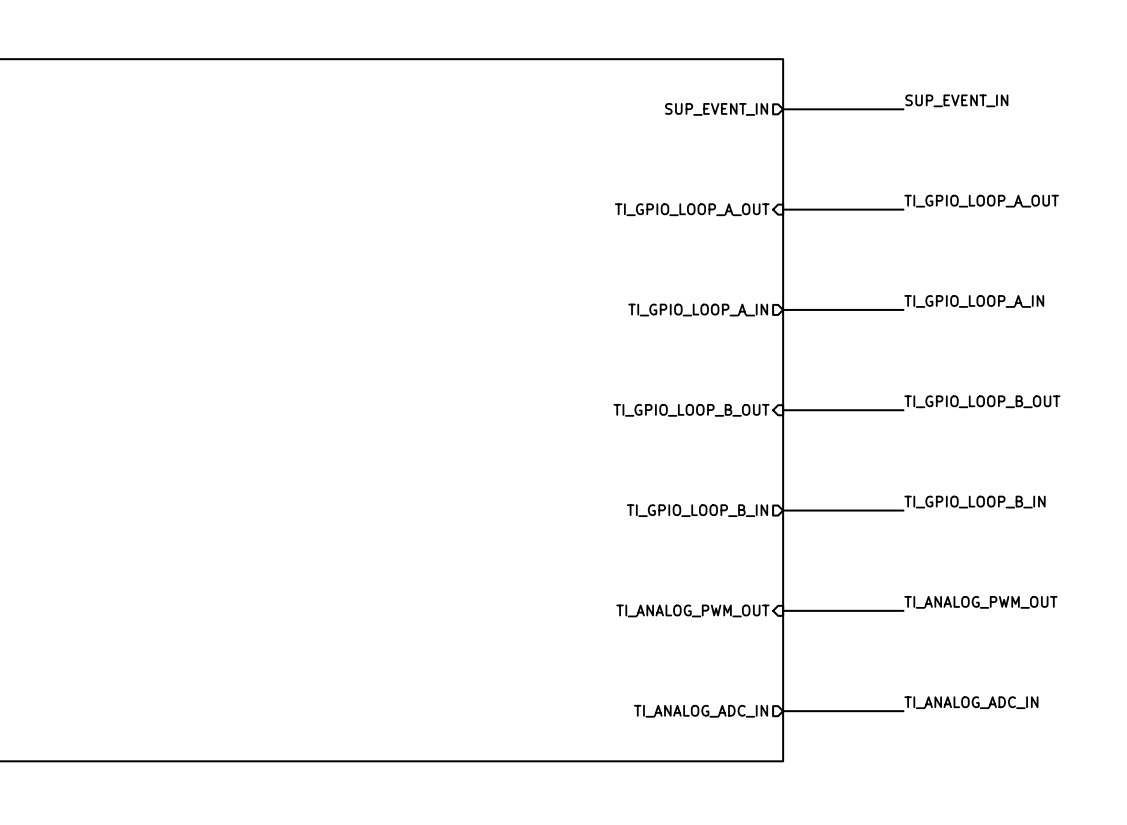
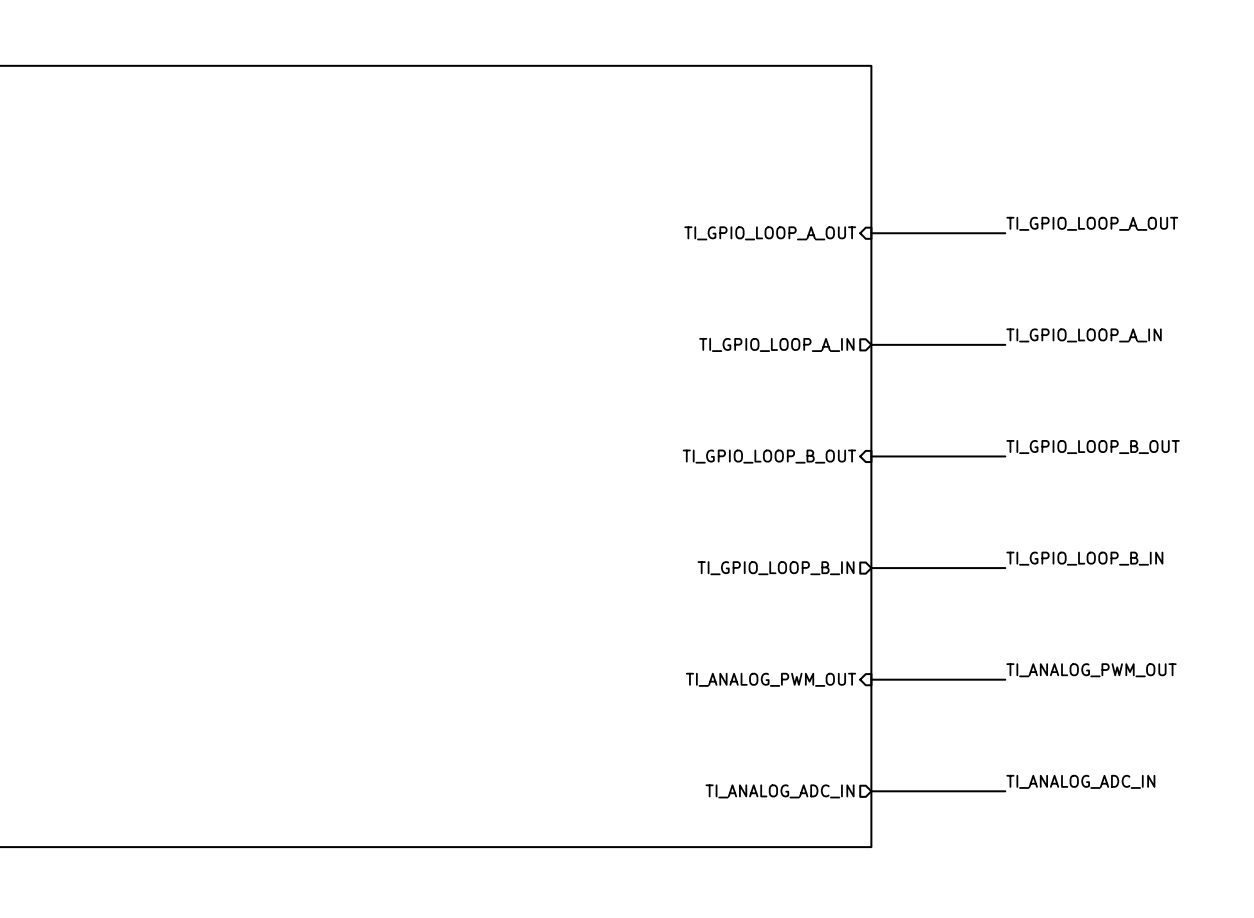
label: SUP_EVENT_IN (956, 100) -> none
sheet pin: SUP_EVENT_IN (716, 109) -> none
wire: (783, 109) (903, 109) -> none

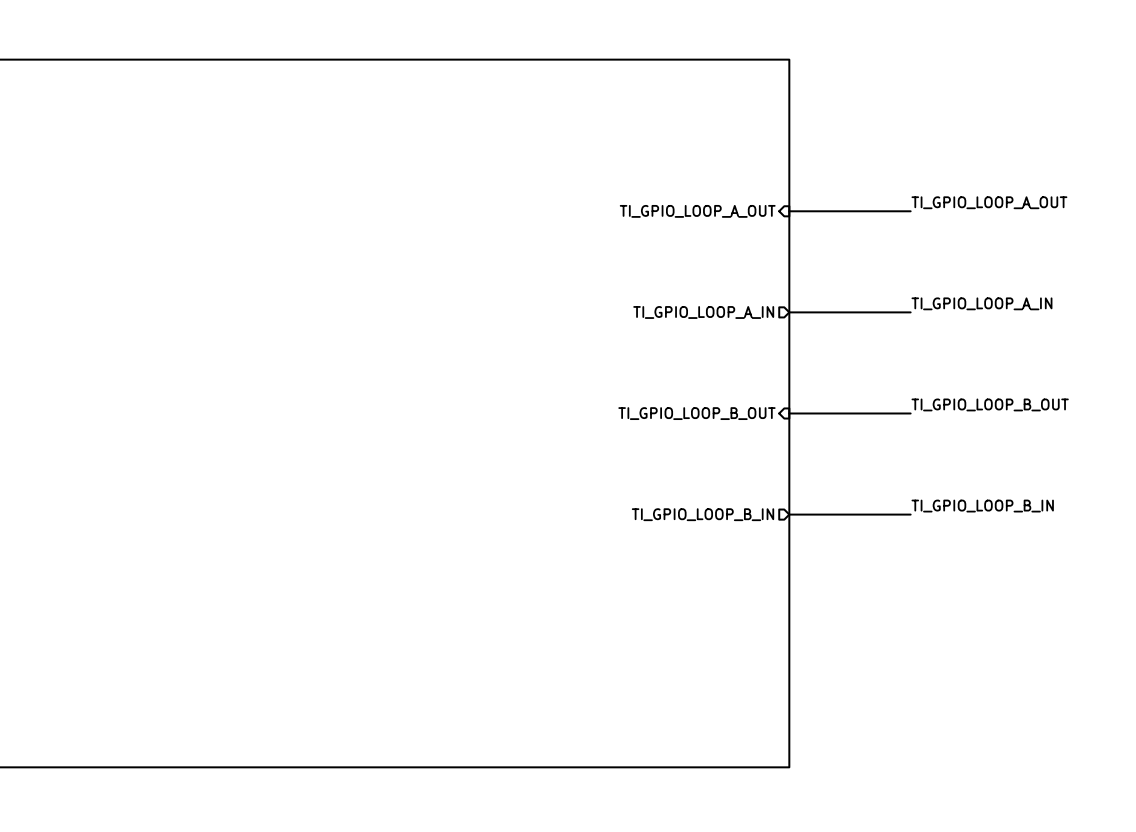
label: TI_ANALOG_PWM_OUT (1091, 670) -> none
sheet pin: TI_ANALOG_PWM_OUT (771, 679) -> none
wire: (871, 679) (1005, 679) -> none
label: TI_ANALOG_ADC_IN (1080, 781) -> none
sheet pin: TI_ANALOG_ADC_IN (780, 791) -> none
wire: (871, 791) (1005, 791) -> none

